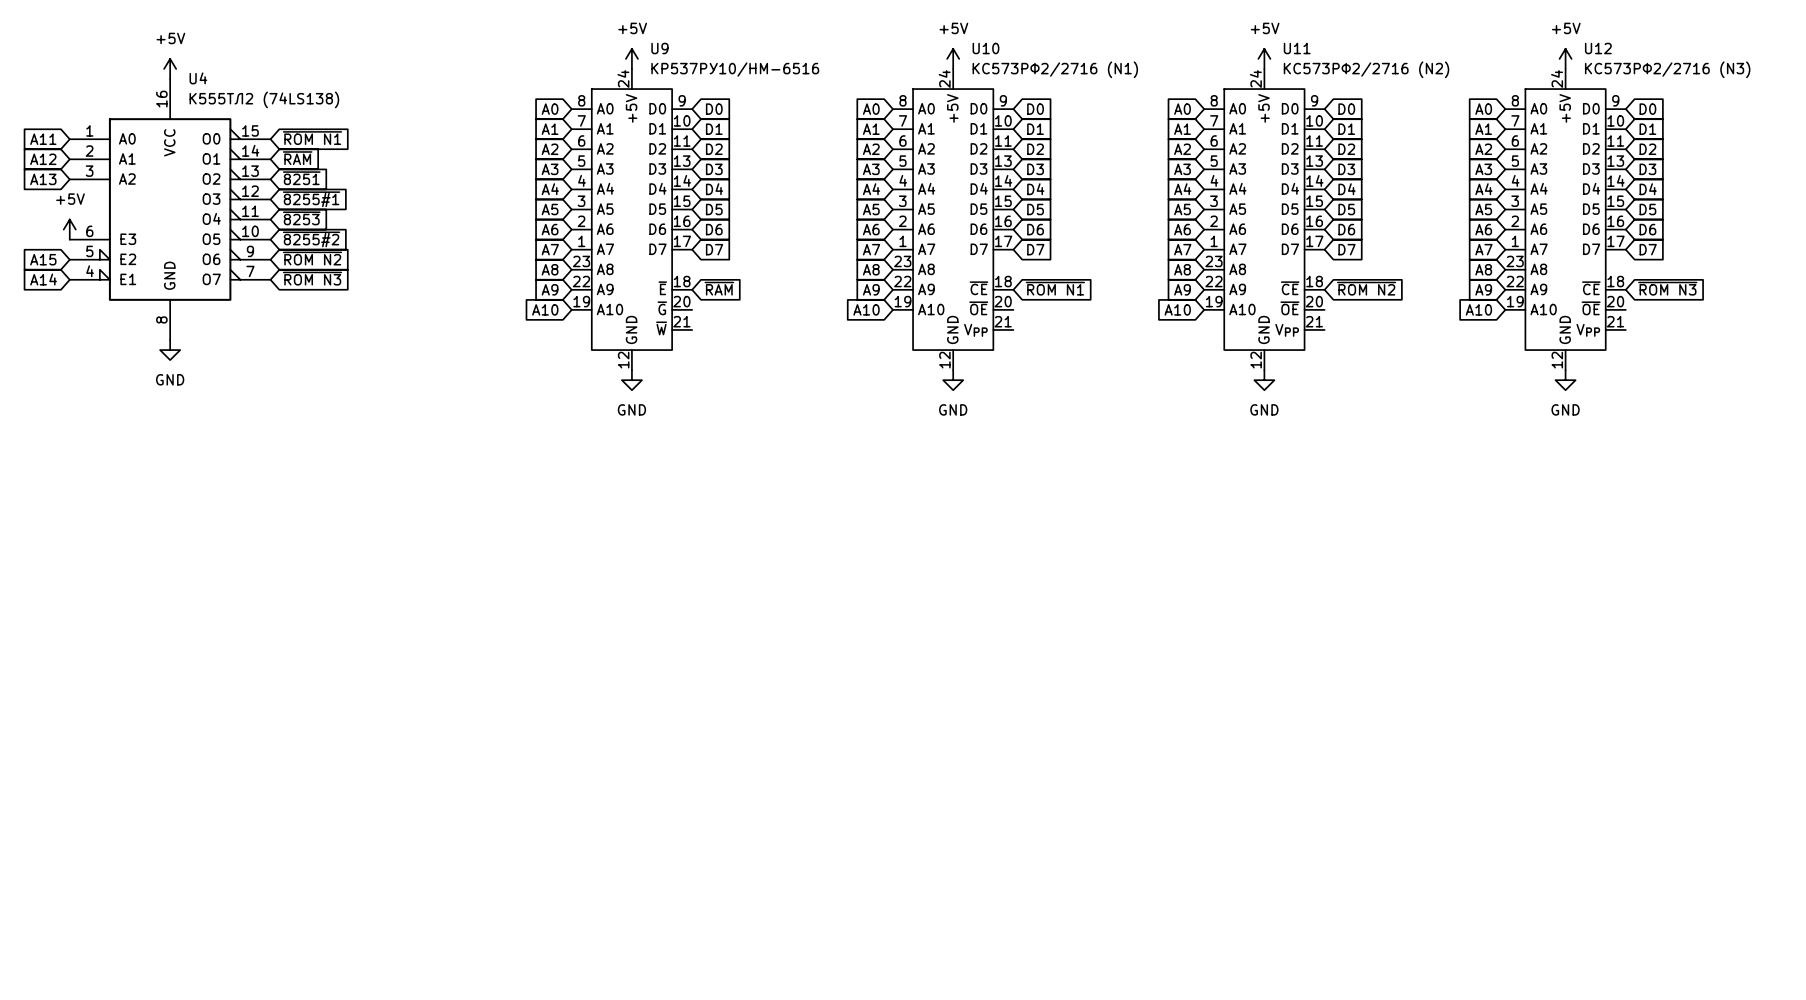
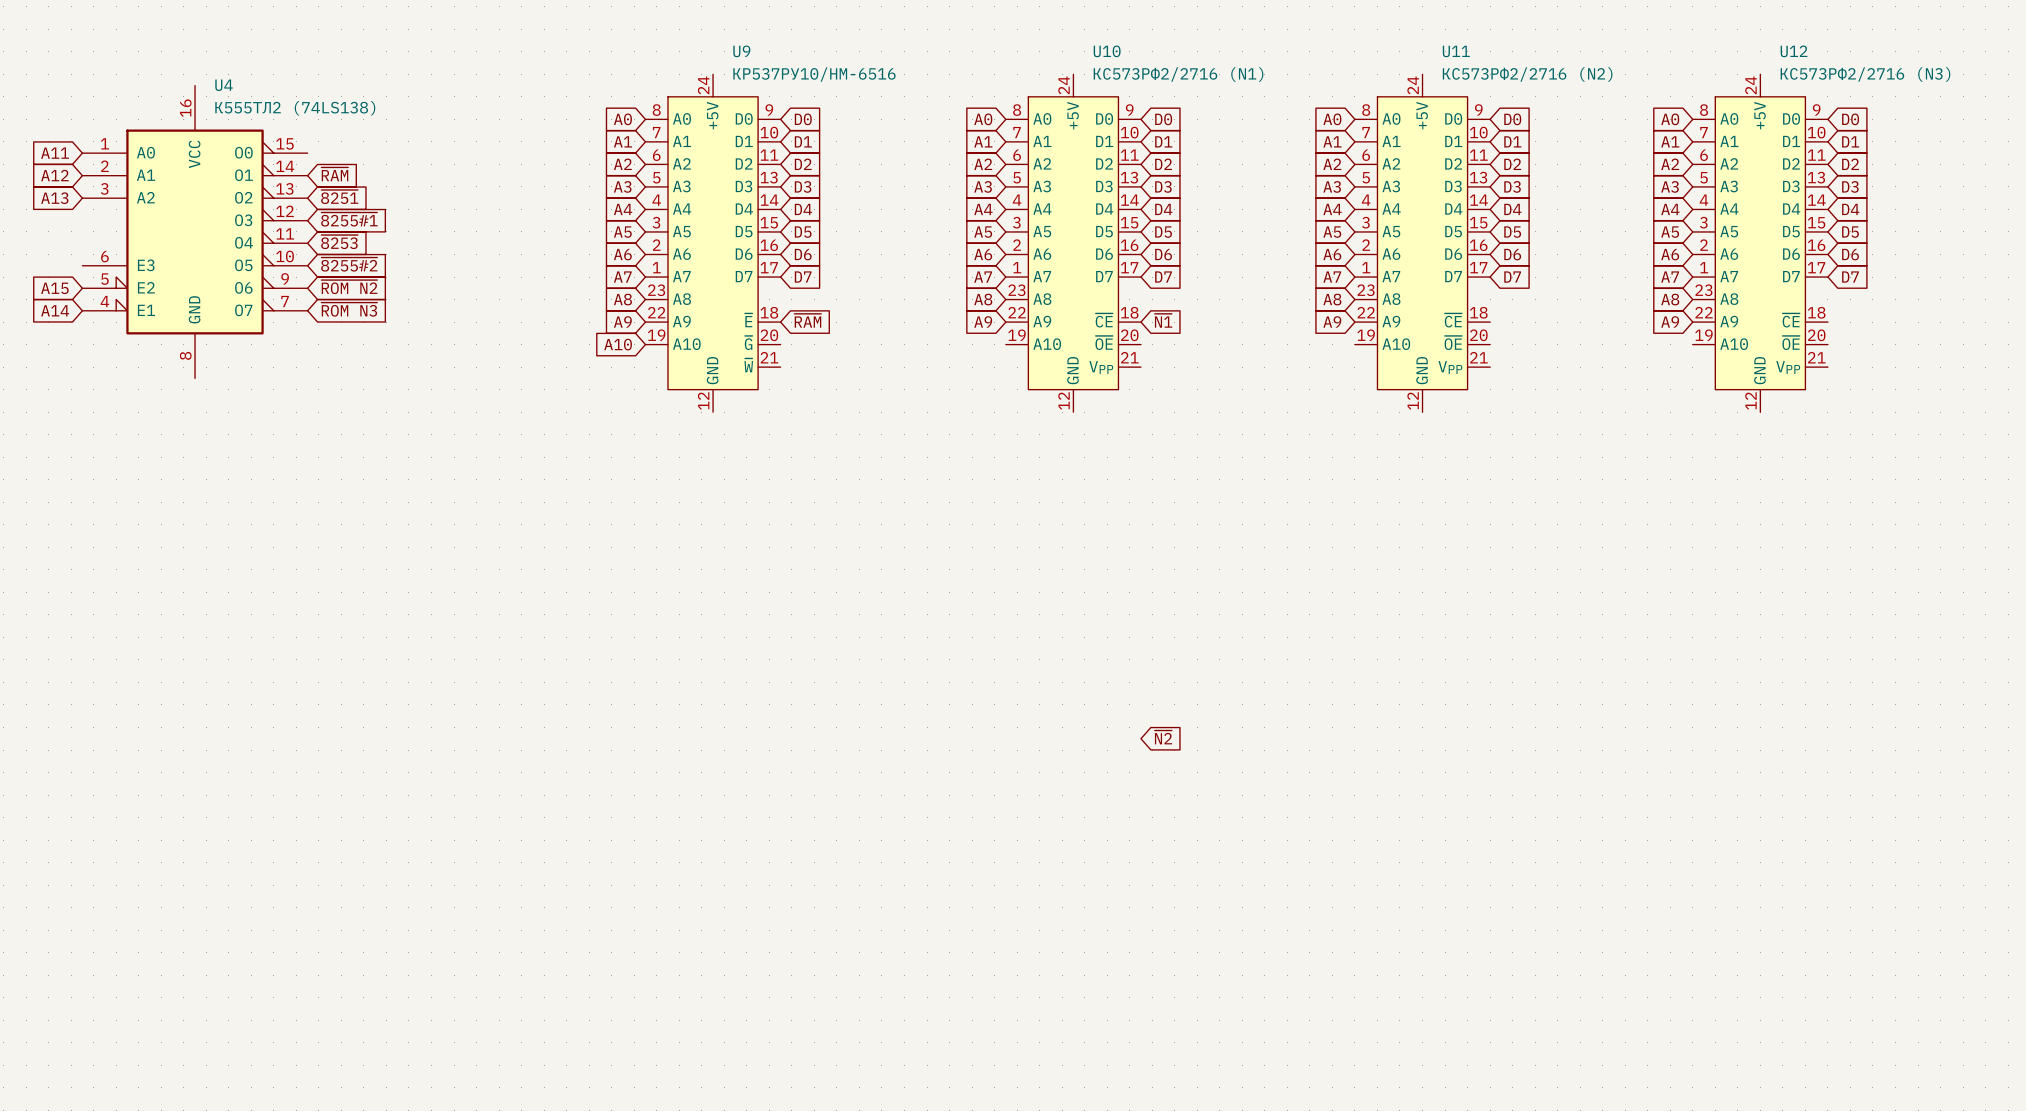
power symbol: +5V (631, 58) -> none
power symbol: +5V (953, 58) -> none
power symbol: +5V (1264, 58) -> none
power symbol: +5V (1565, 58) -> none
power symbol: +5V (170, 68) -> none
global label: ~{ROM N1} (312, 138) -> none
power symbol: +5V (69, 229) -> none
global label: ~{ROM N1} (1055, 288) -> ~{N1} (1163, 320)
global label: ~{ROM N2} (1366, 288) -> none
global label: ~{ROM N3} (1667, 288) -> none
global label: A10 (866, 309) -> none
global label: A10 (1177, 309) -> none
global label: A10 (1478, 309) -> none
power symbol: GND (170, 350) -> none
power symbol: GND (631, 380) -> none
power symbol: GND (953, 380) -> none
power symbol: GND (1264, 380) -> none
power symbol: GND (1565, 380) -> none
global label: none -> ~{N2} (1163, 737)

